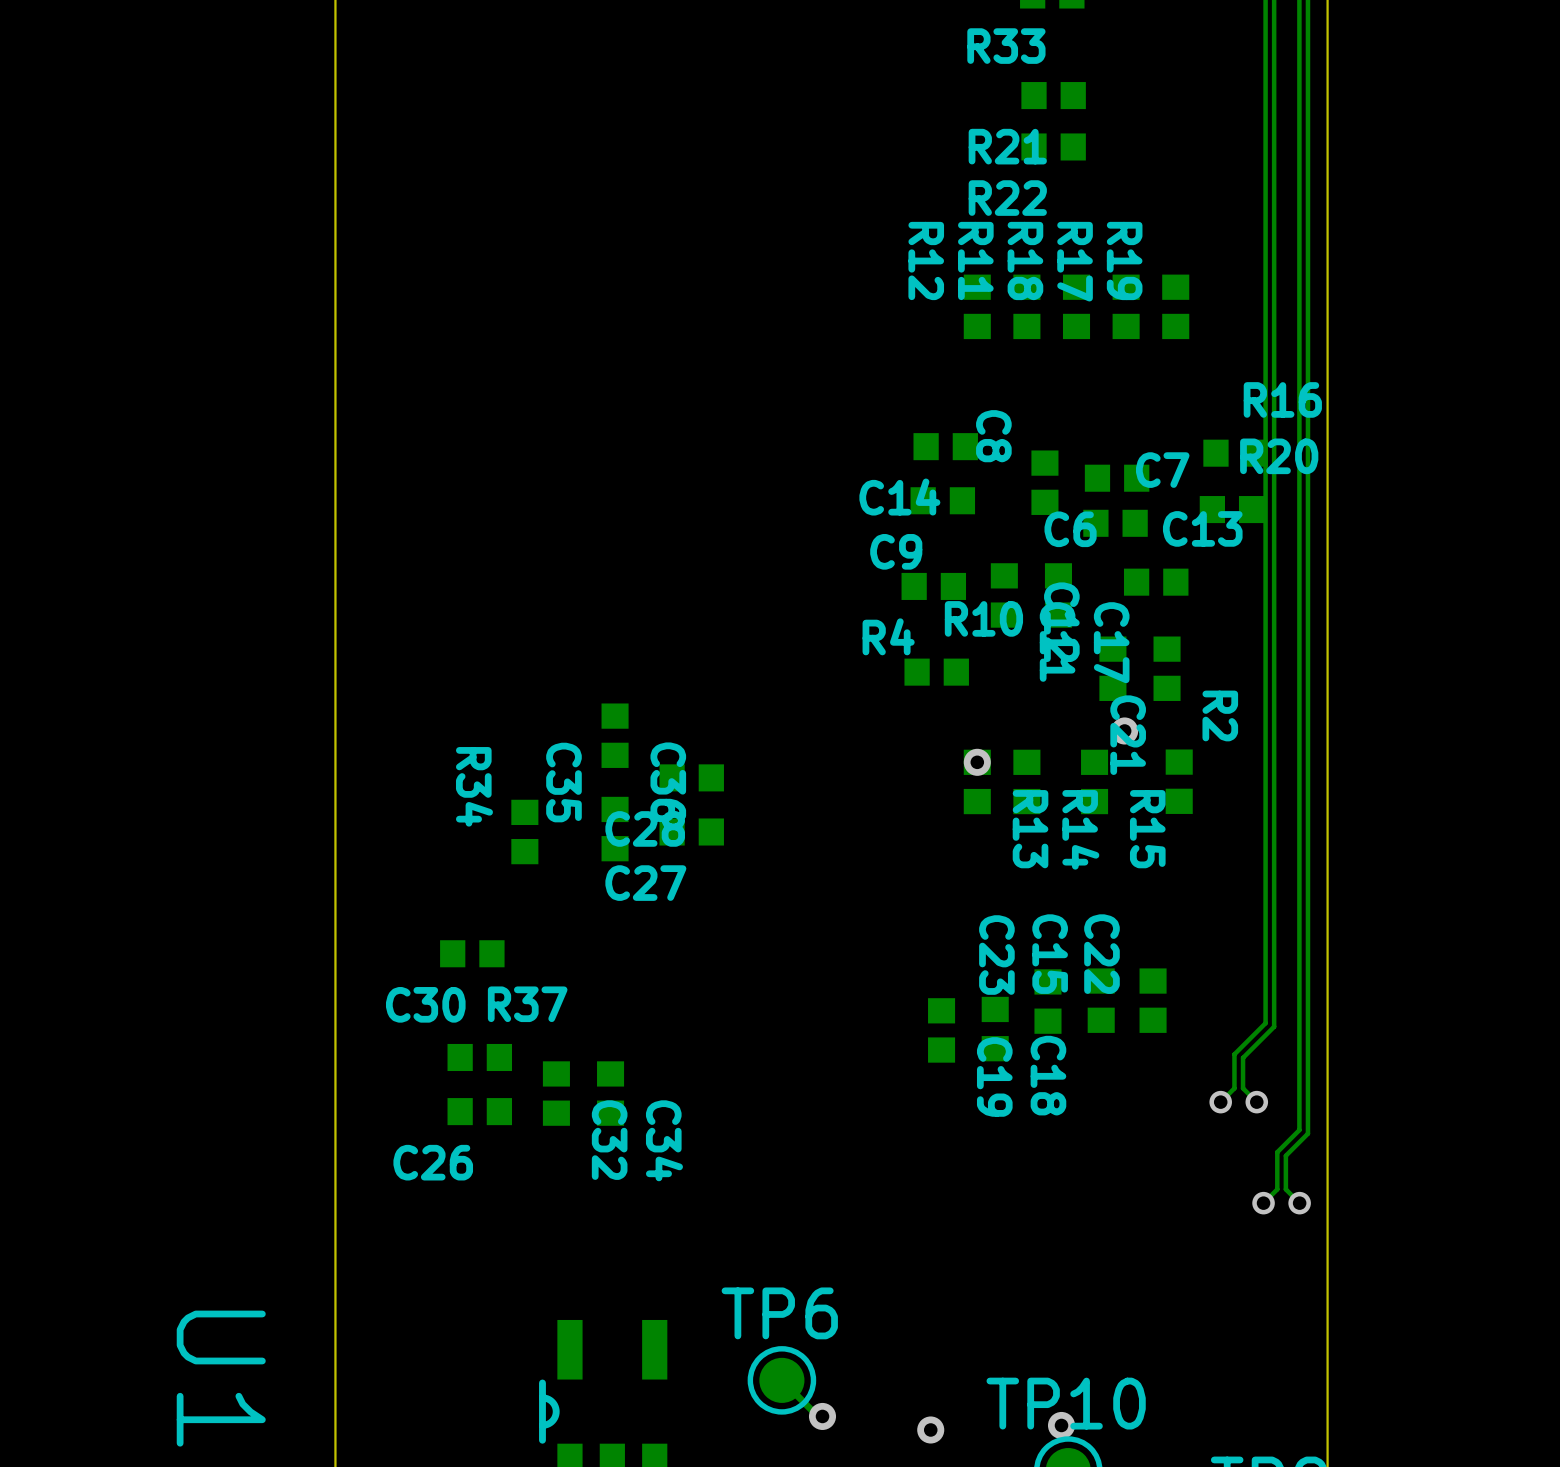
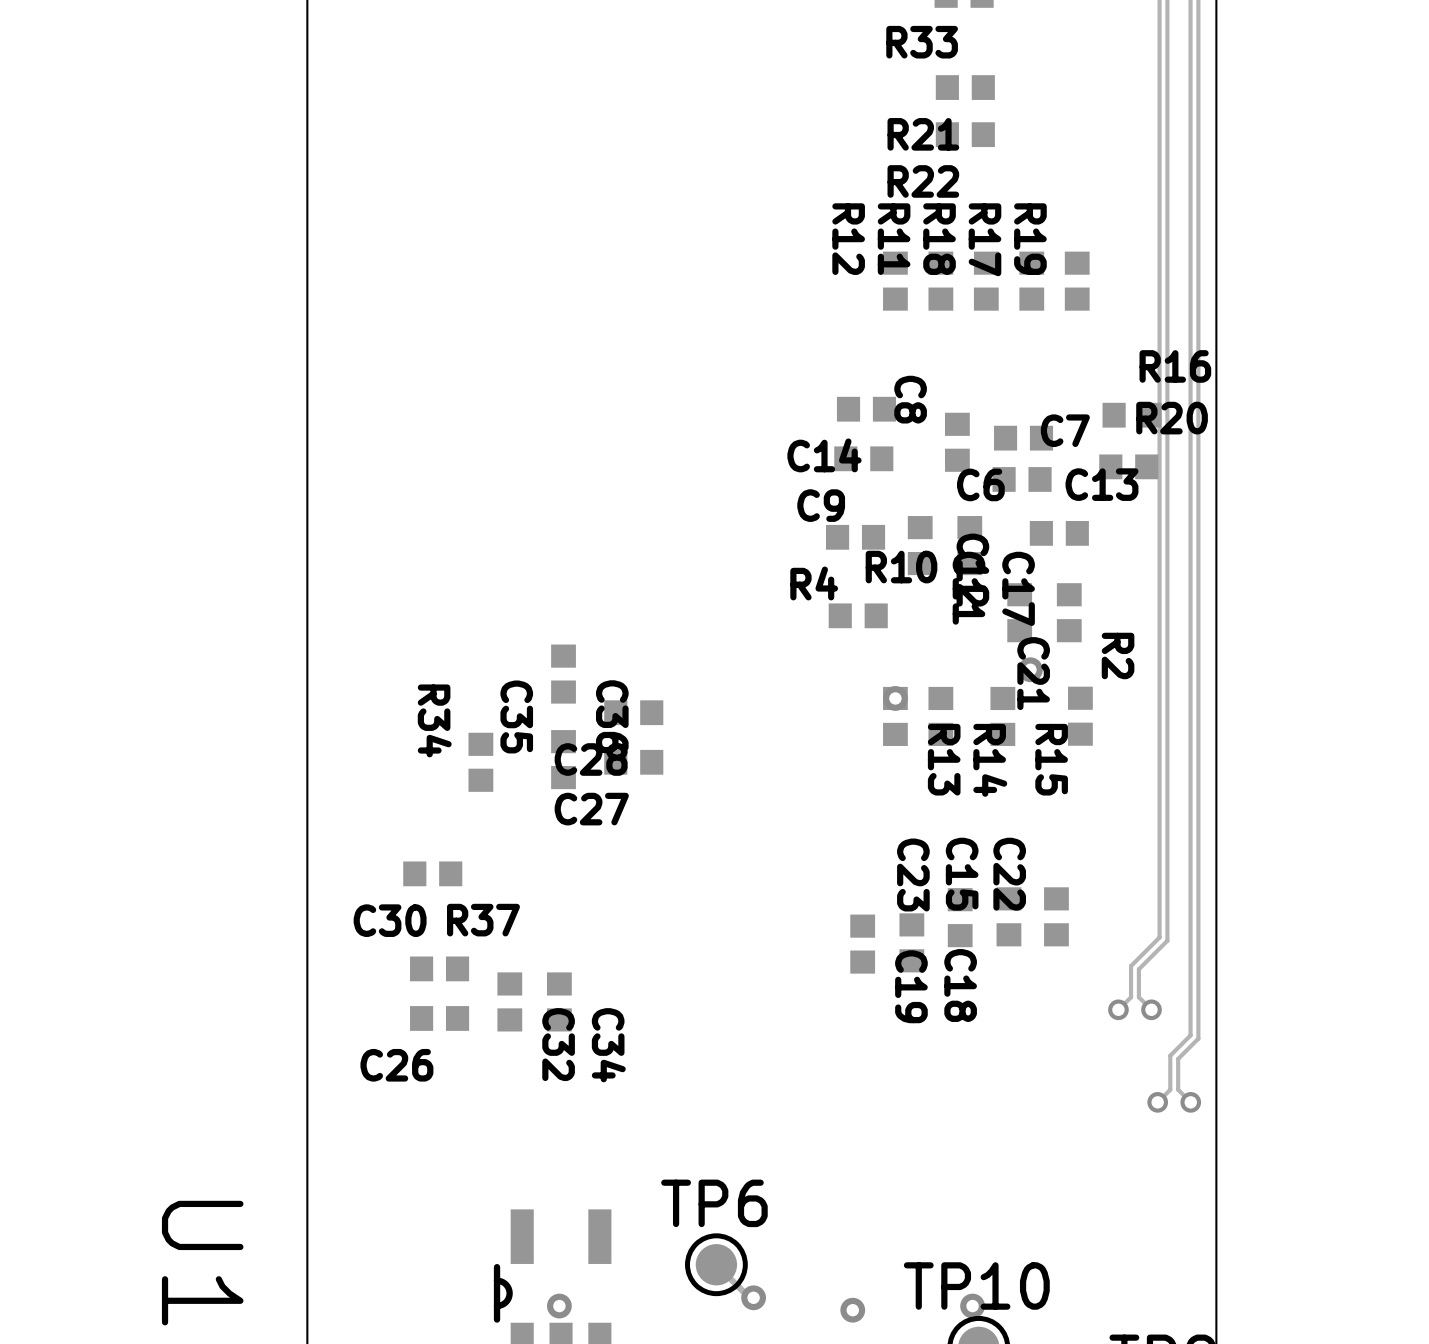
via: none -> (559, 1306)

